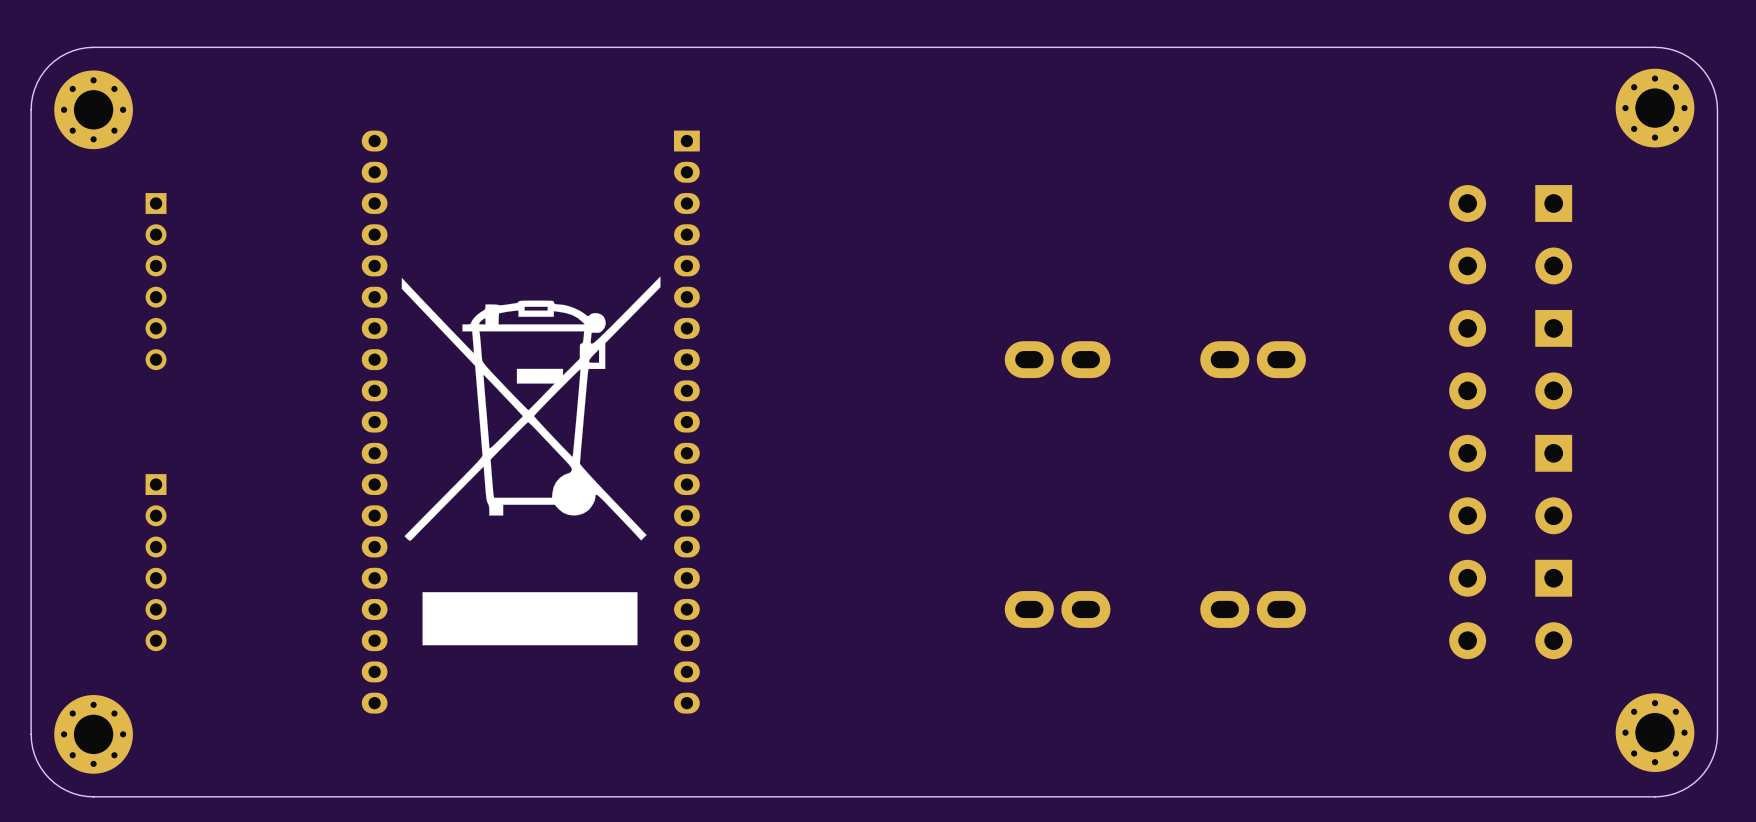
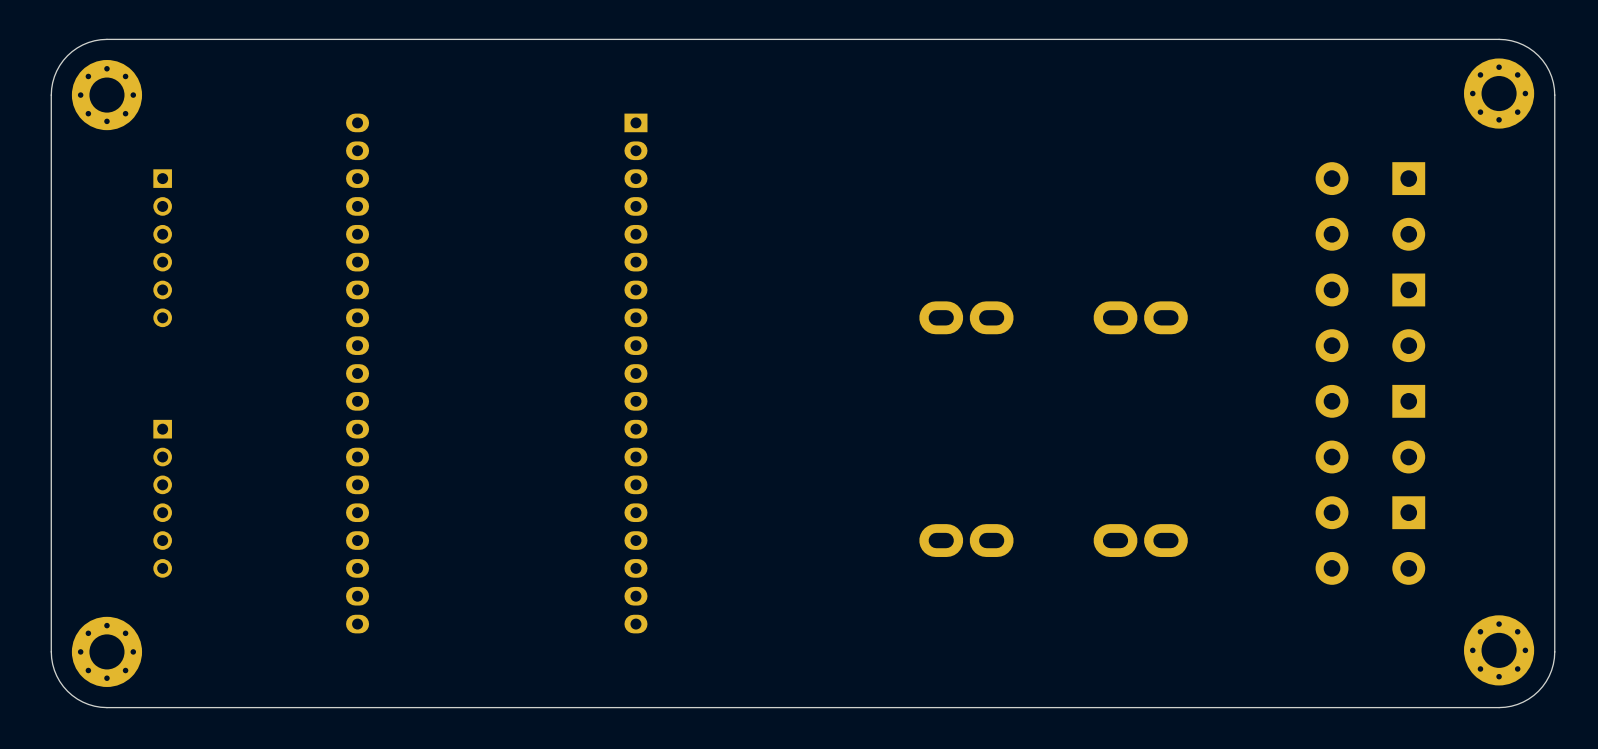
drawing: [401, 276, 661, 646] -> none

